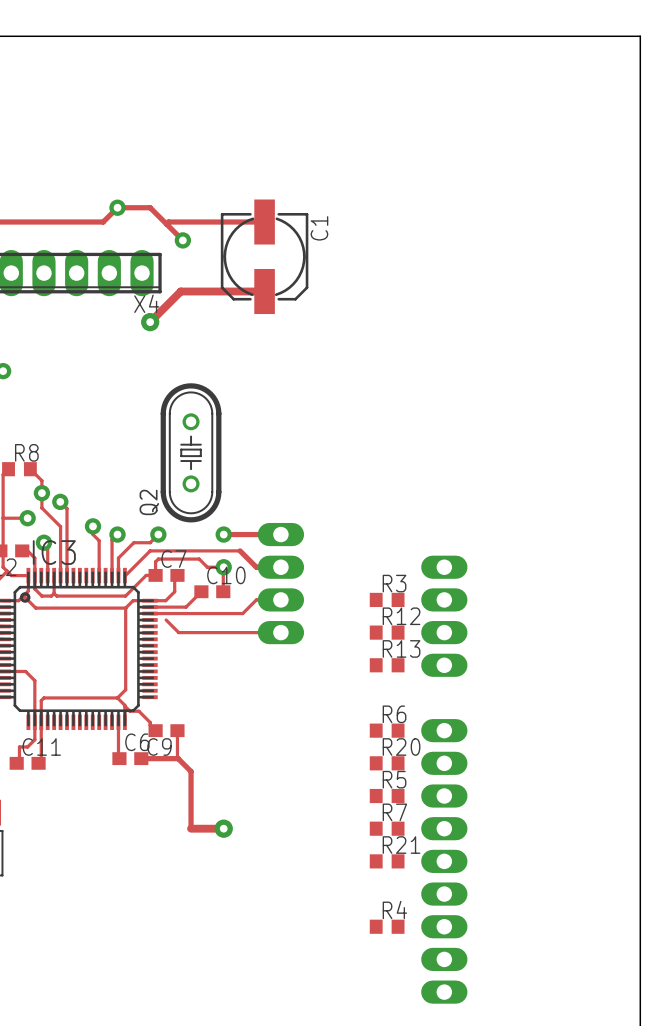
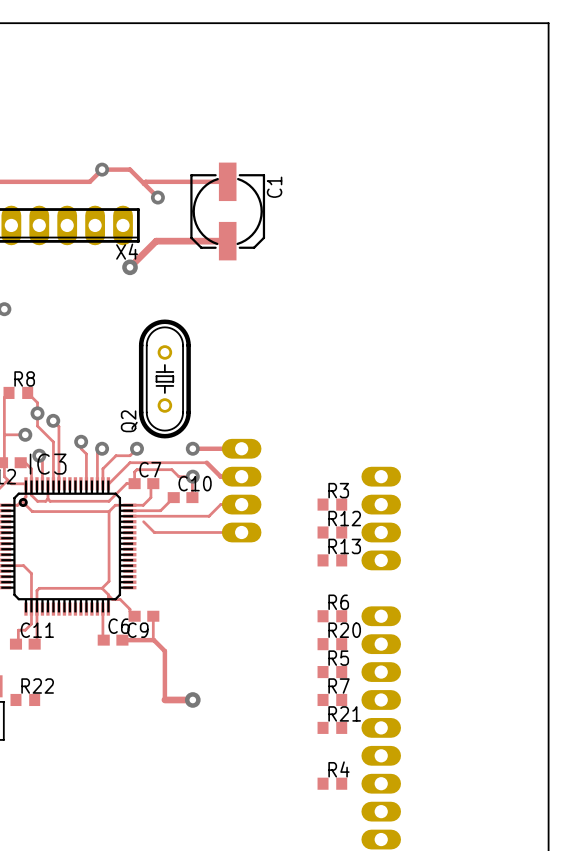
R22: none -> (25, 699)

